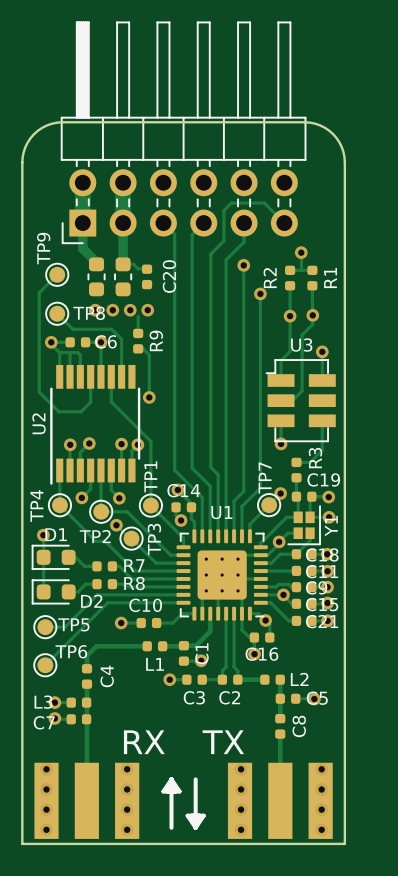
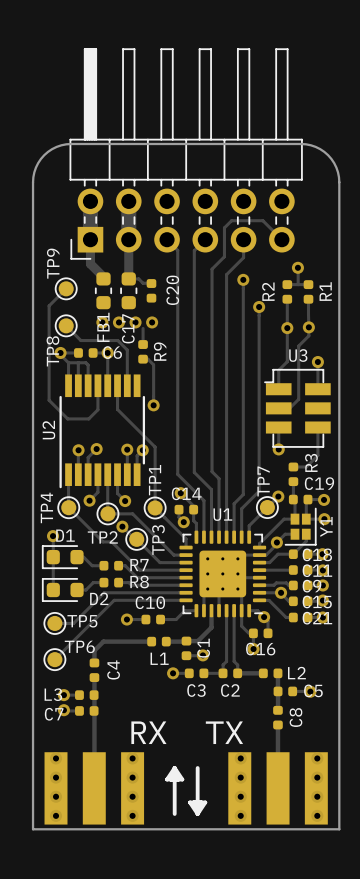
TP8 name rotation: 0° (89, 313) -> 90° counterclockwise (52, 351)
TP8 name position: TP8 (89, 313) -> TP8 (52, 351)
FB1 name: none -> FB1 (103, 327)
C17 name: none -> C17 (128, 328)

